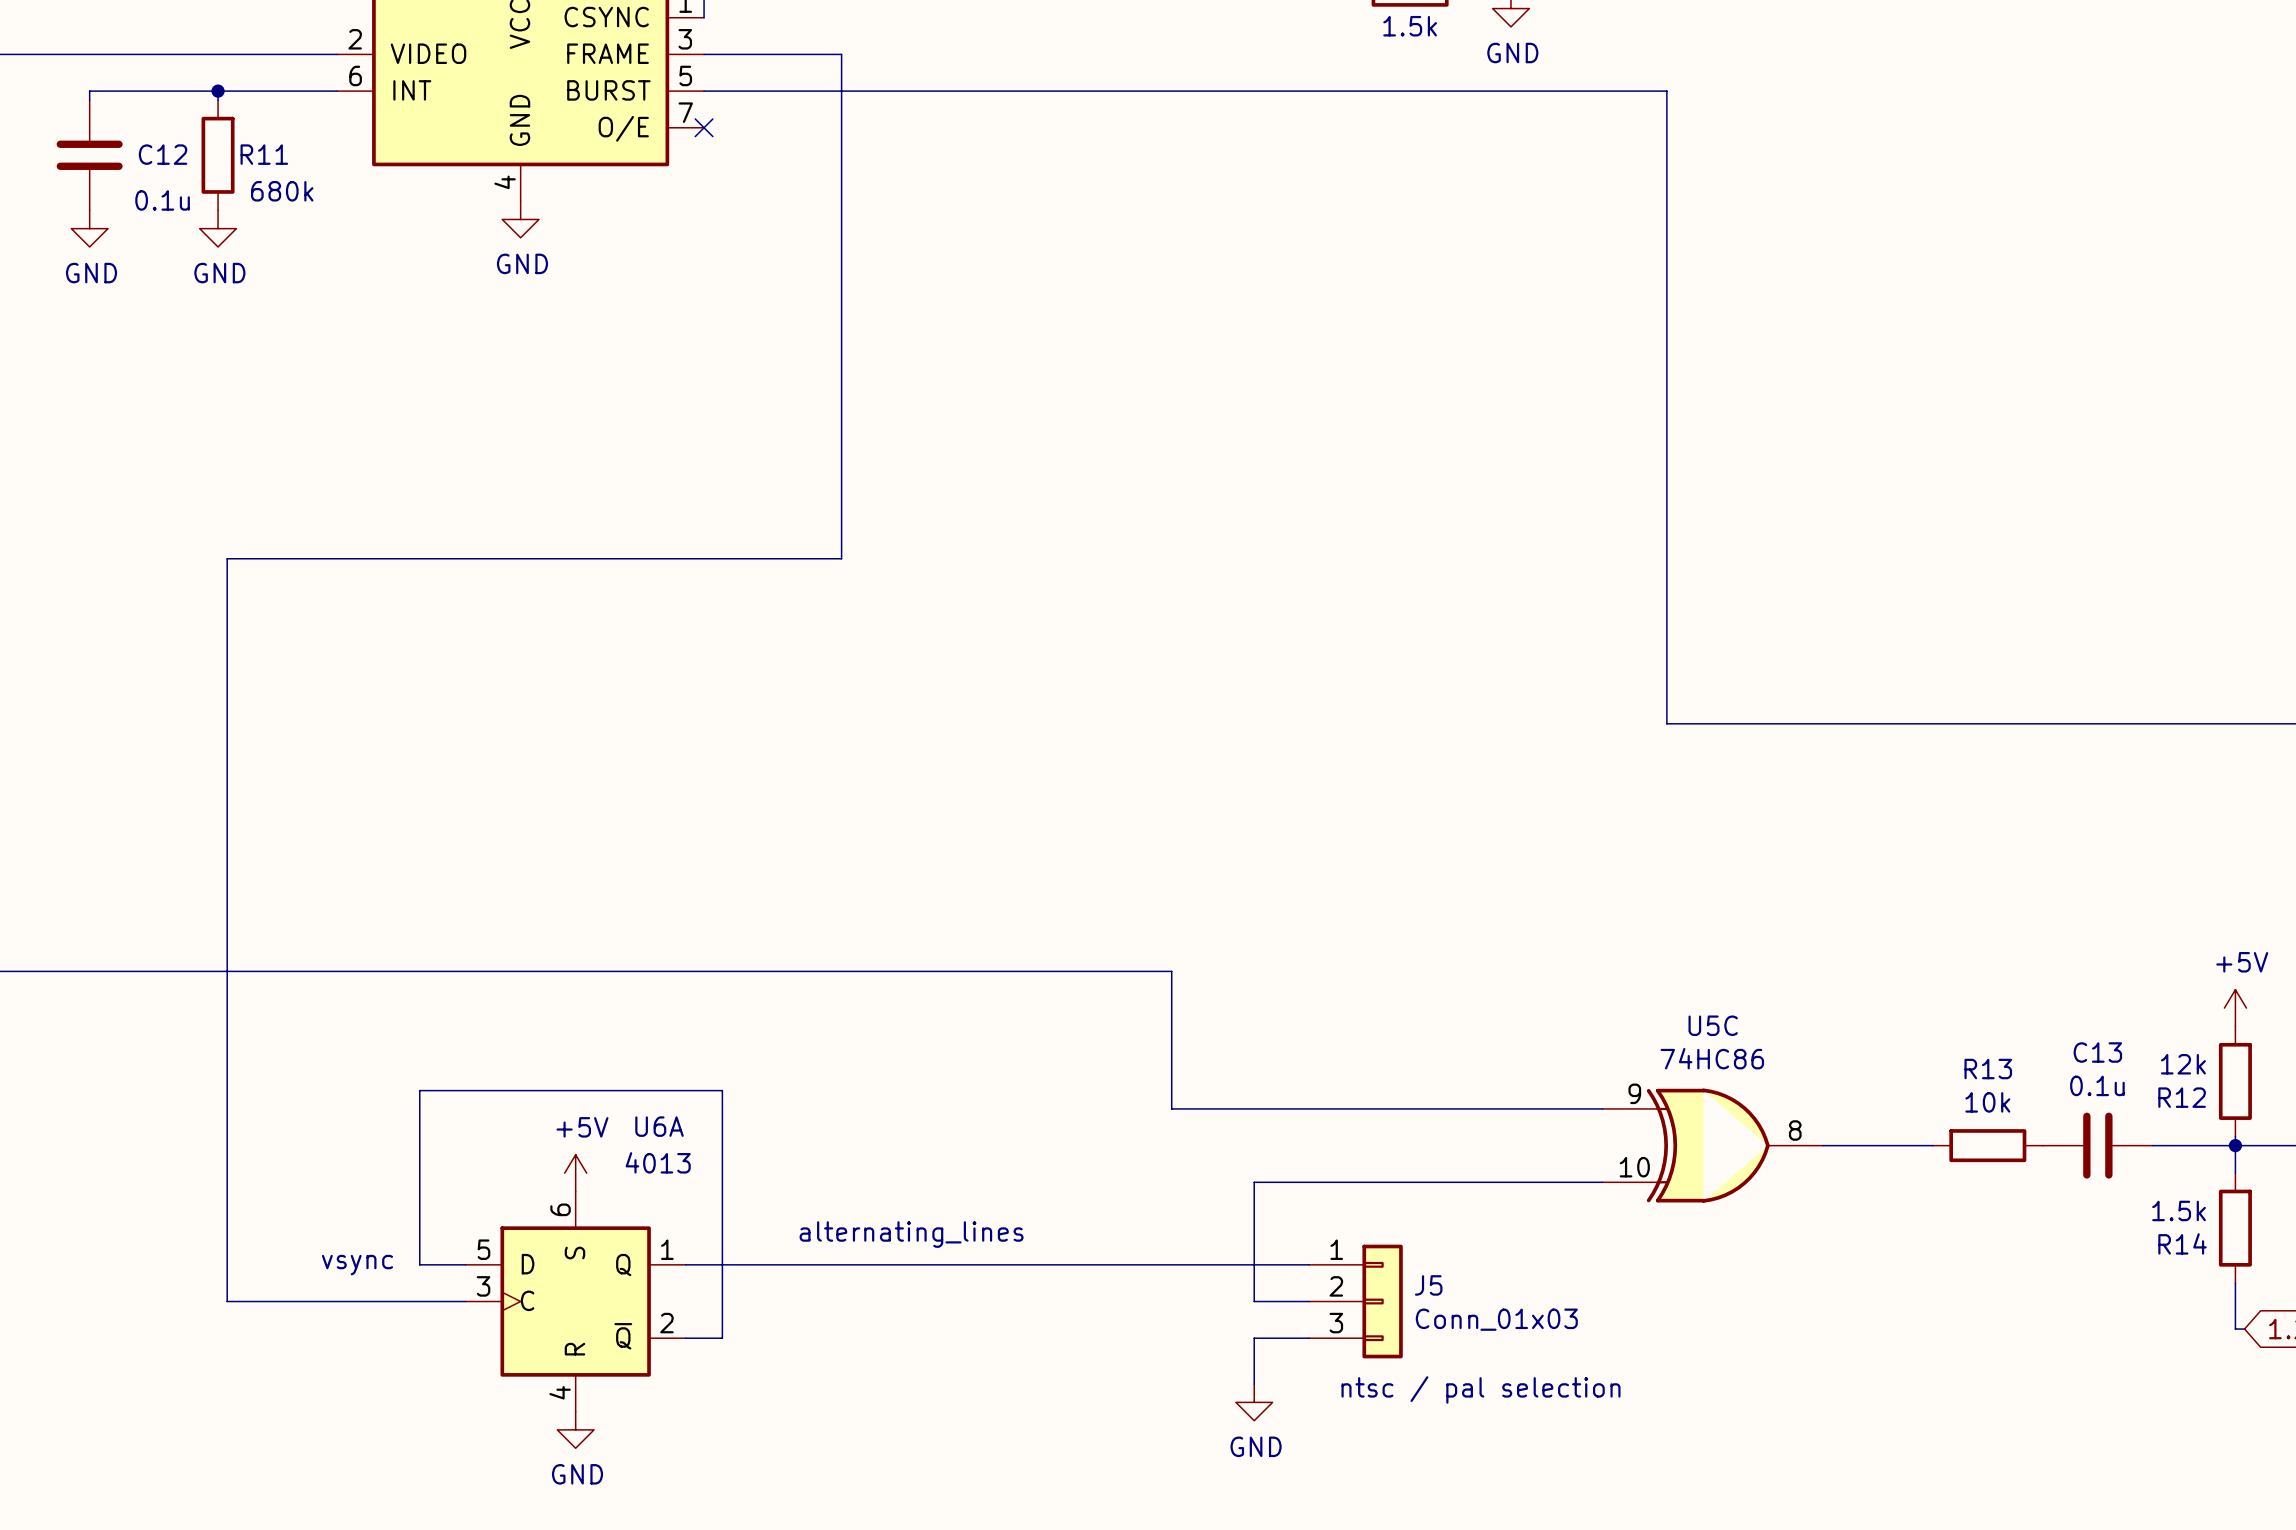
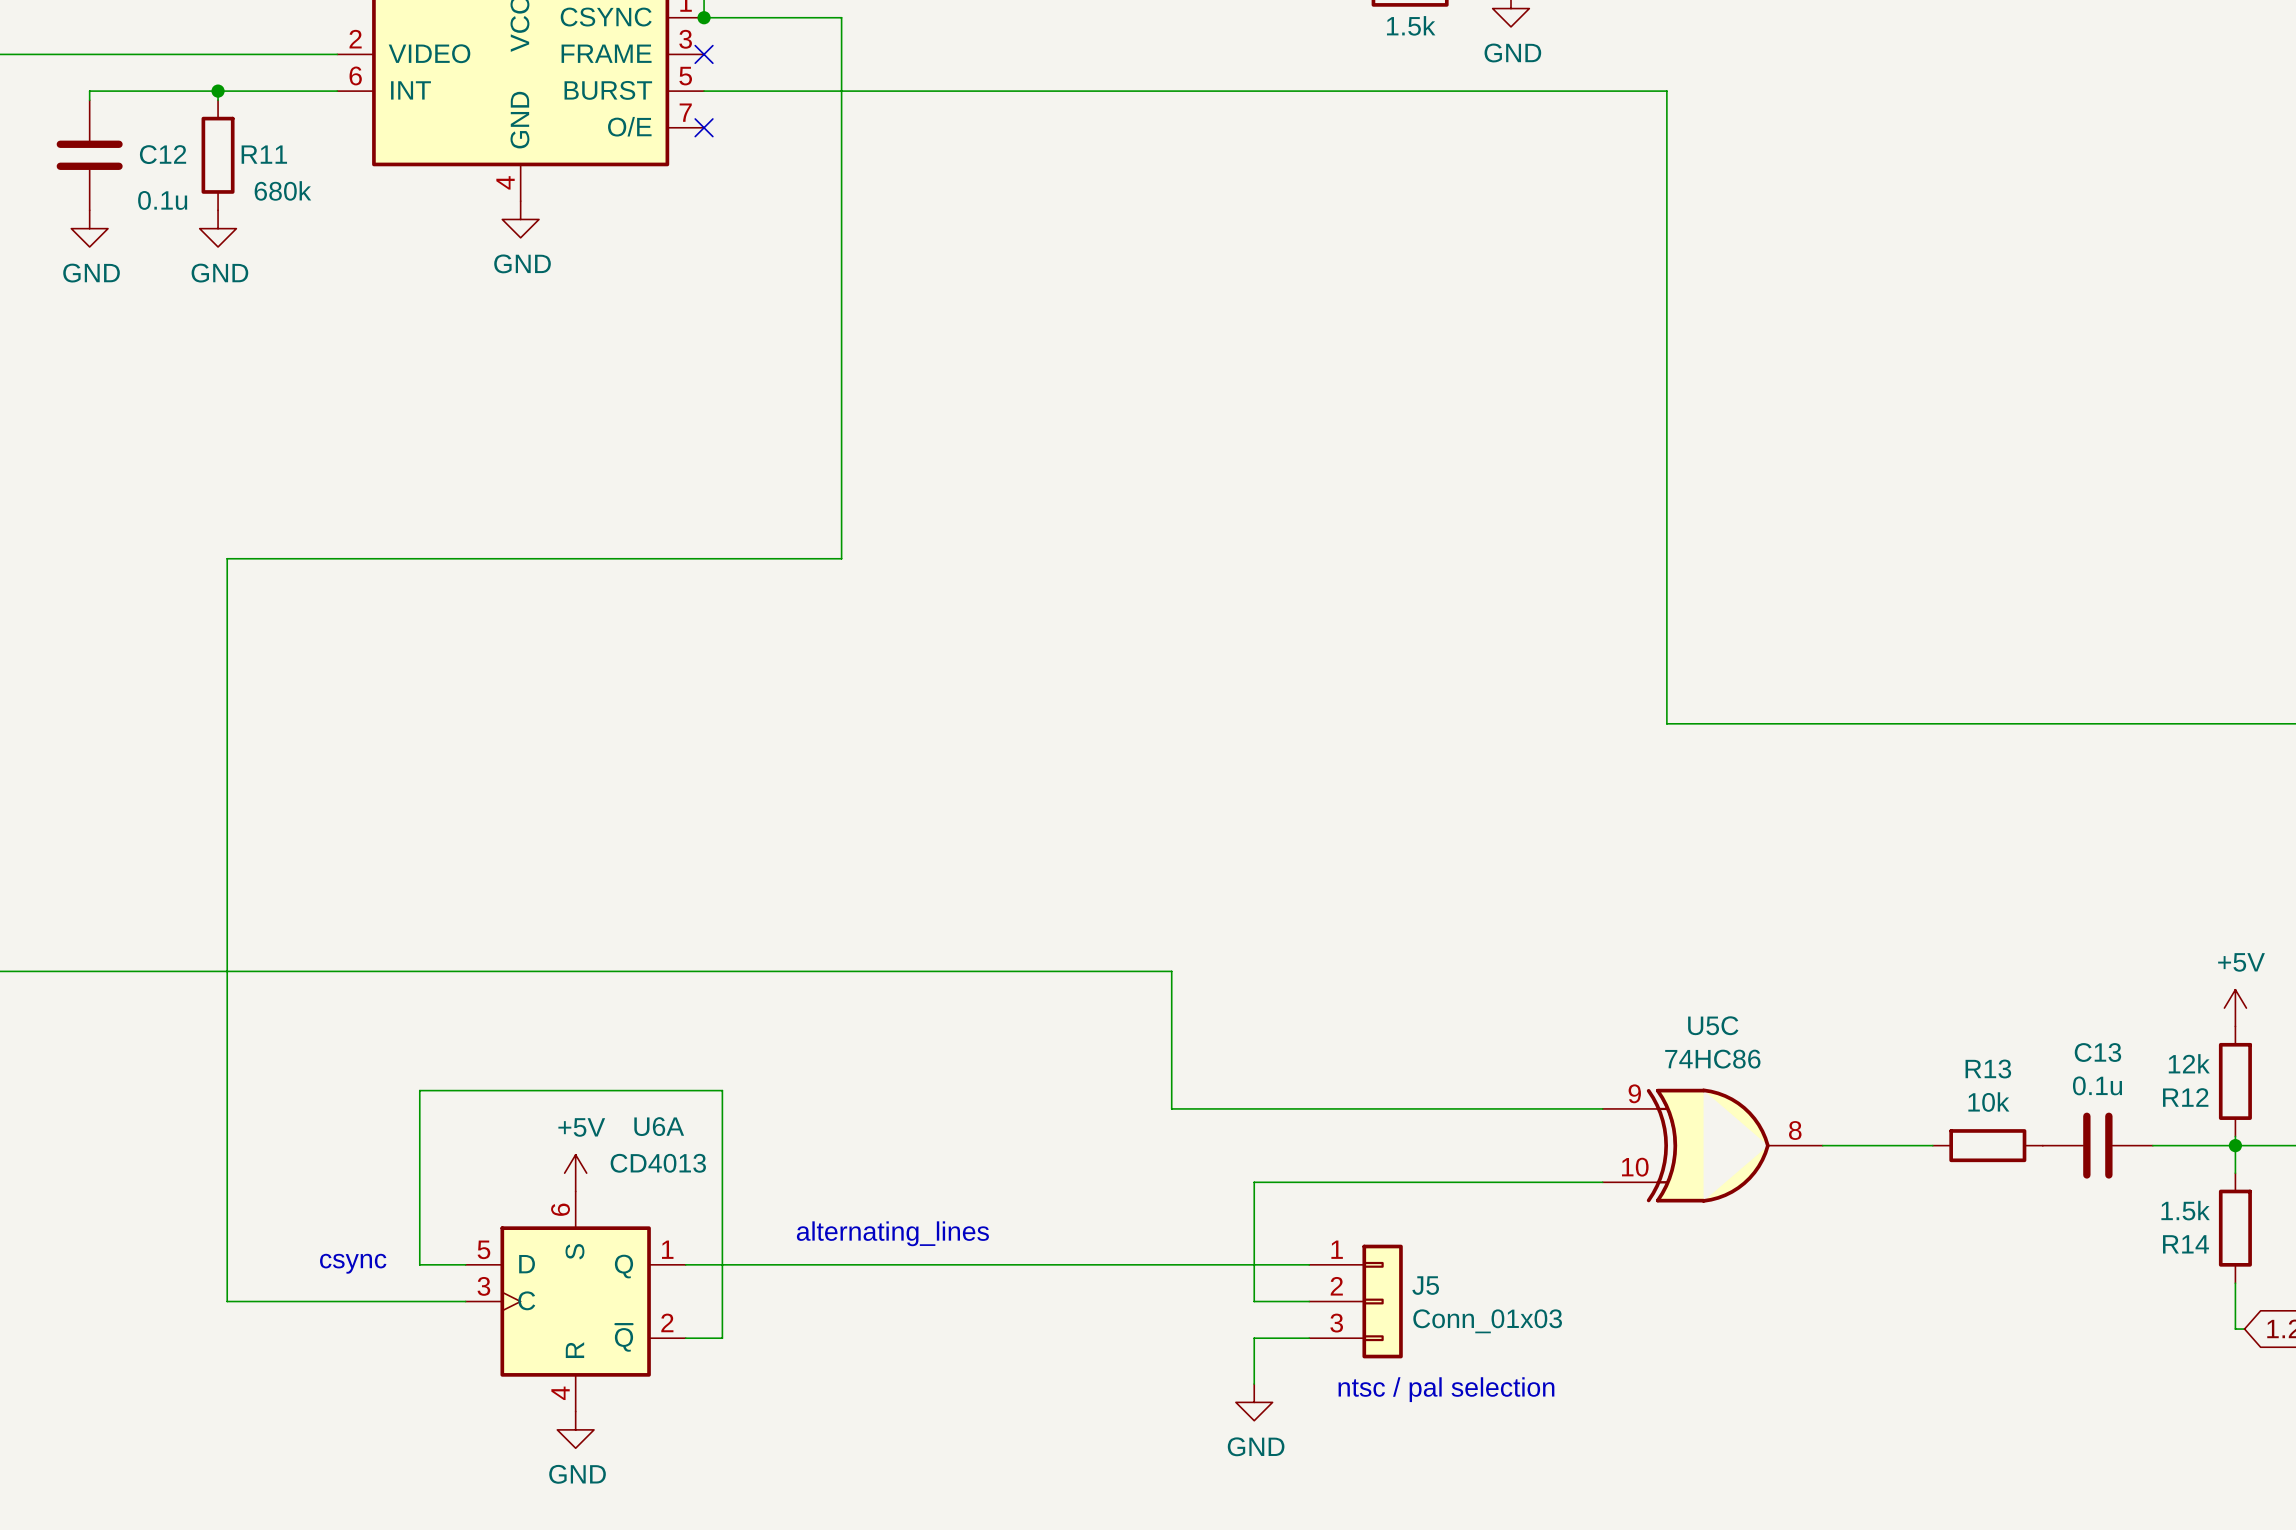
junction: none -> (704, 17)
wire: (704, 54) (841, 54) -> (704, 17) (841, 17) (841, 54)
no-connect mark: none -> (704, 54)
U6A value: 4013 (658, 1162) -> CD4013 (658, 1163)
text: vsync (357, 1265) -> csync (353, 1263)

